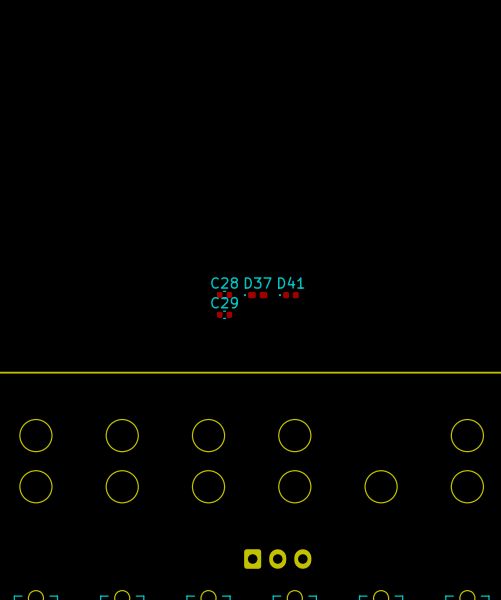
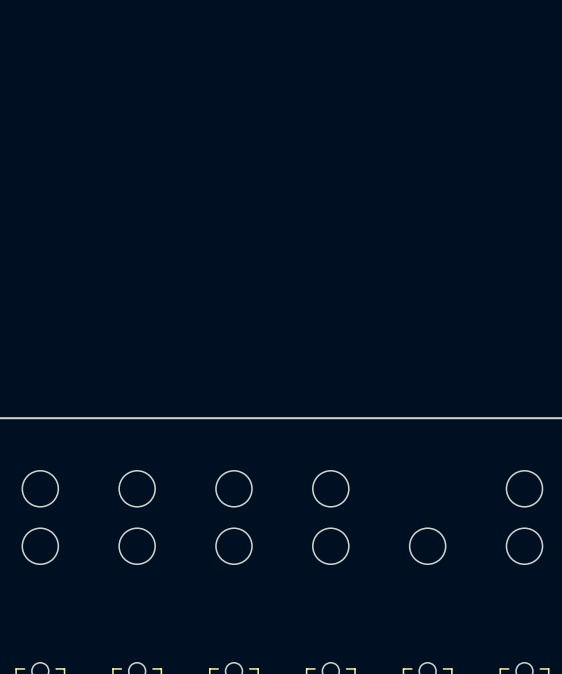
C28: (224, 295) -> none
D37: (255, 295) -> none
D41: (288, 295) -> none
C29: (224, 314) -> none
part: (277, 559) -> none

